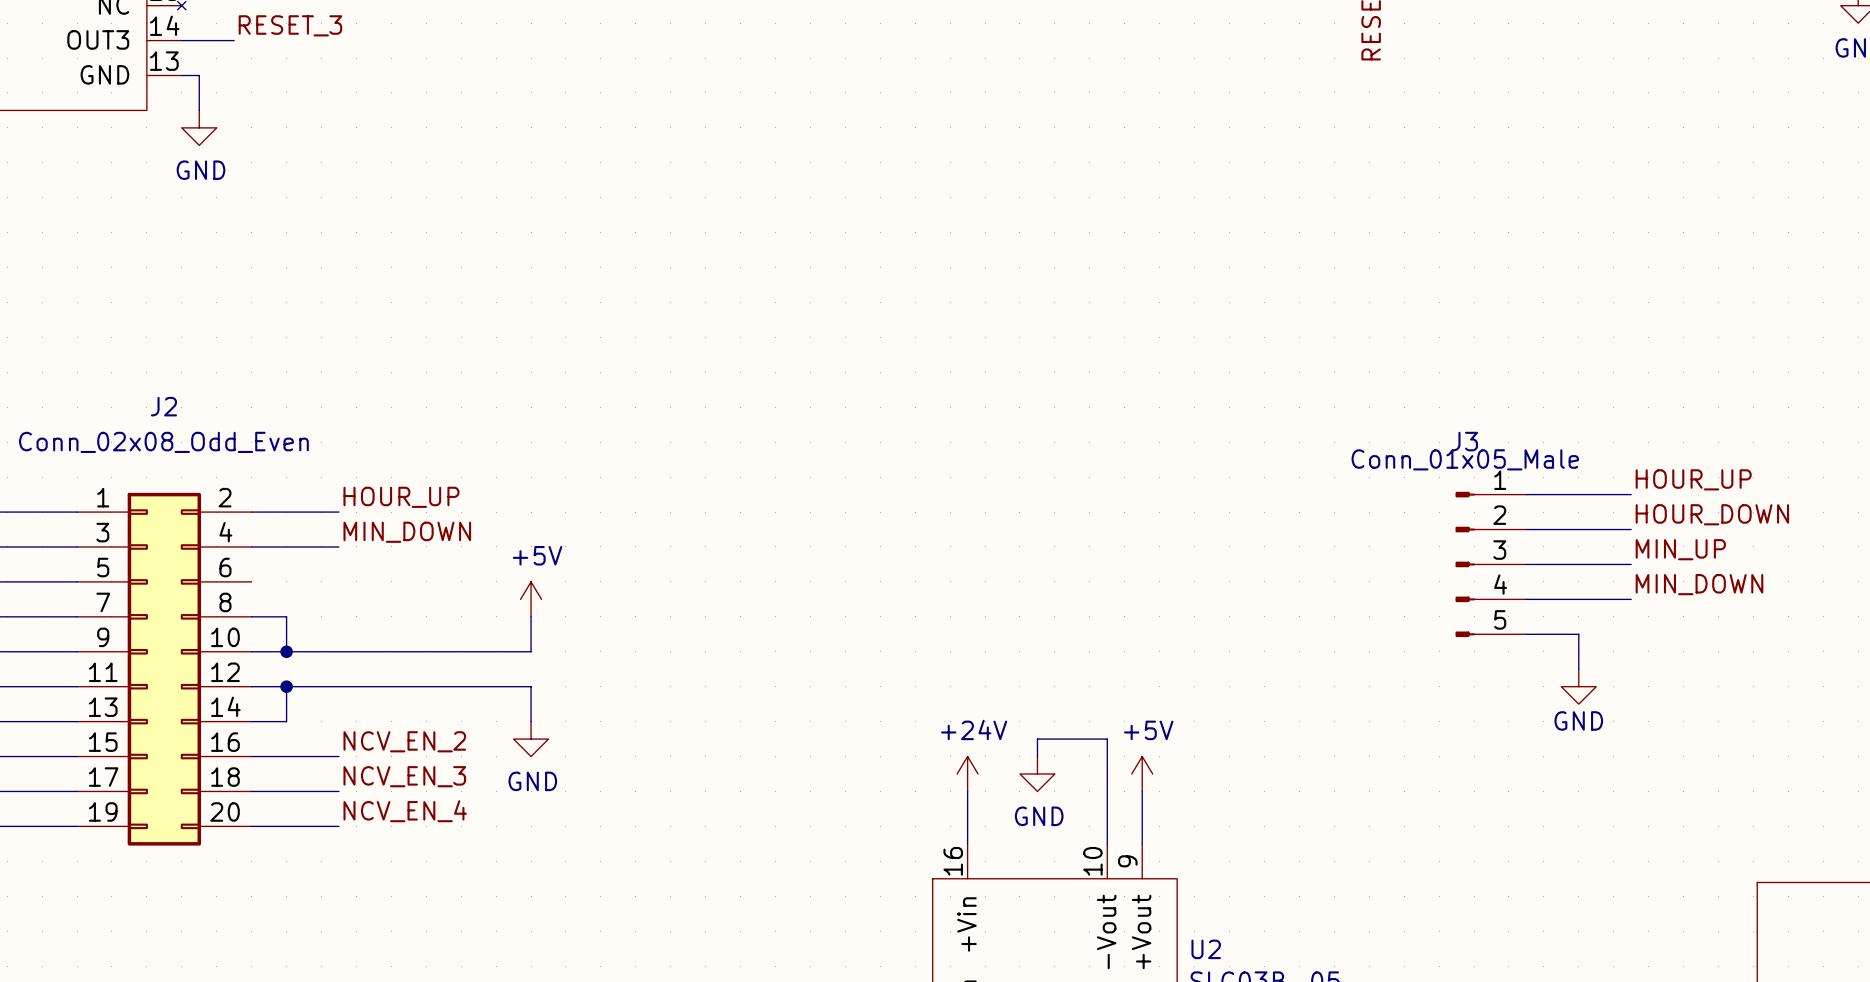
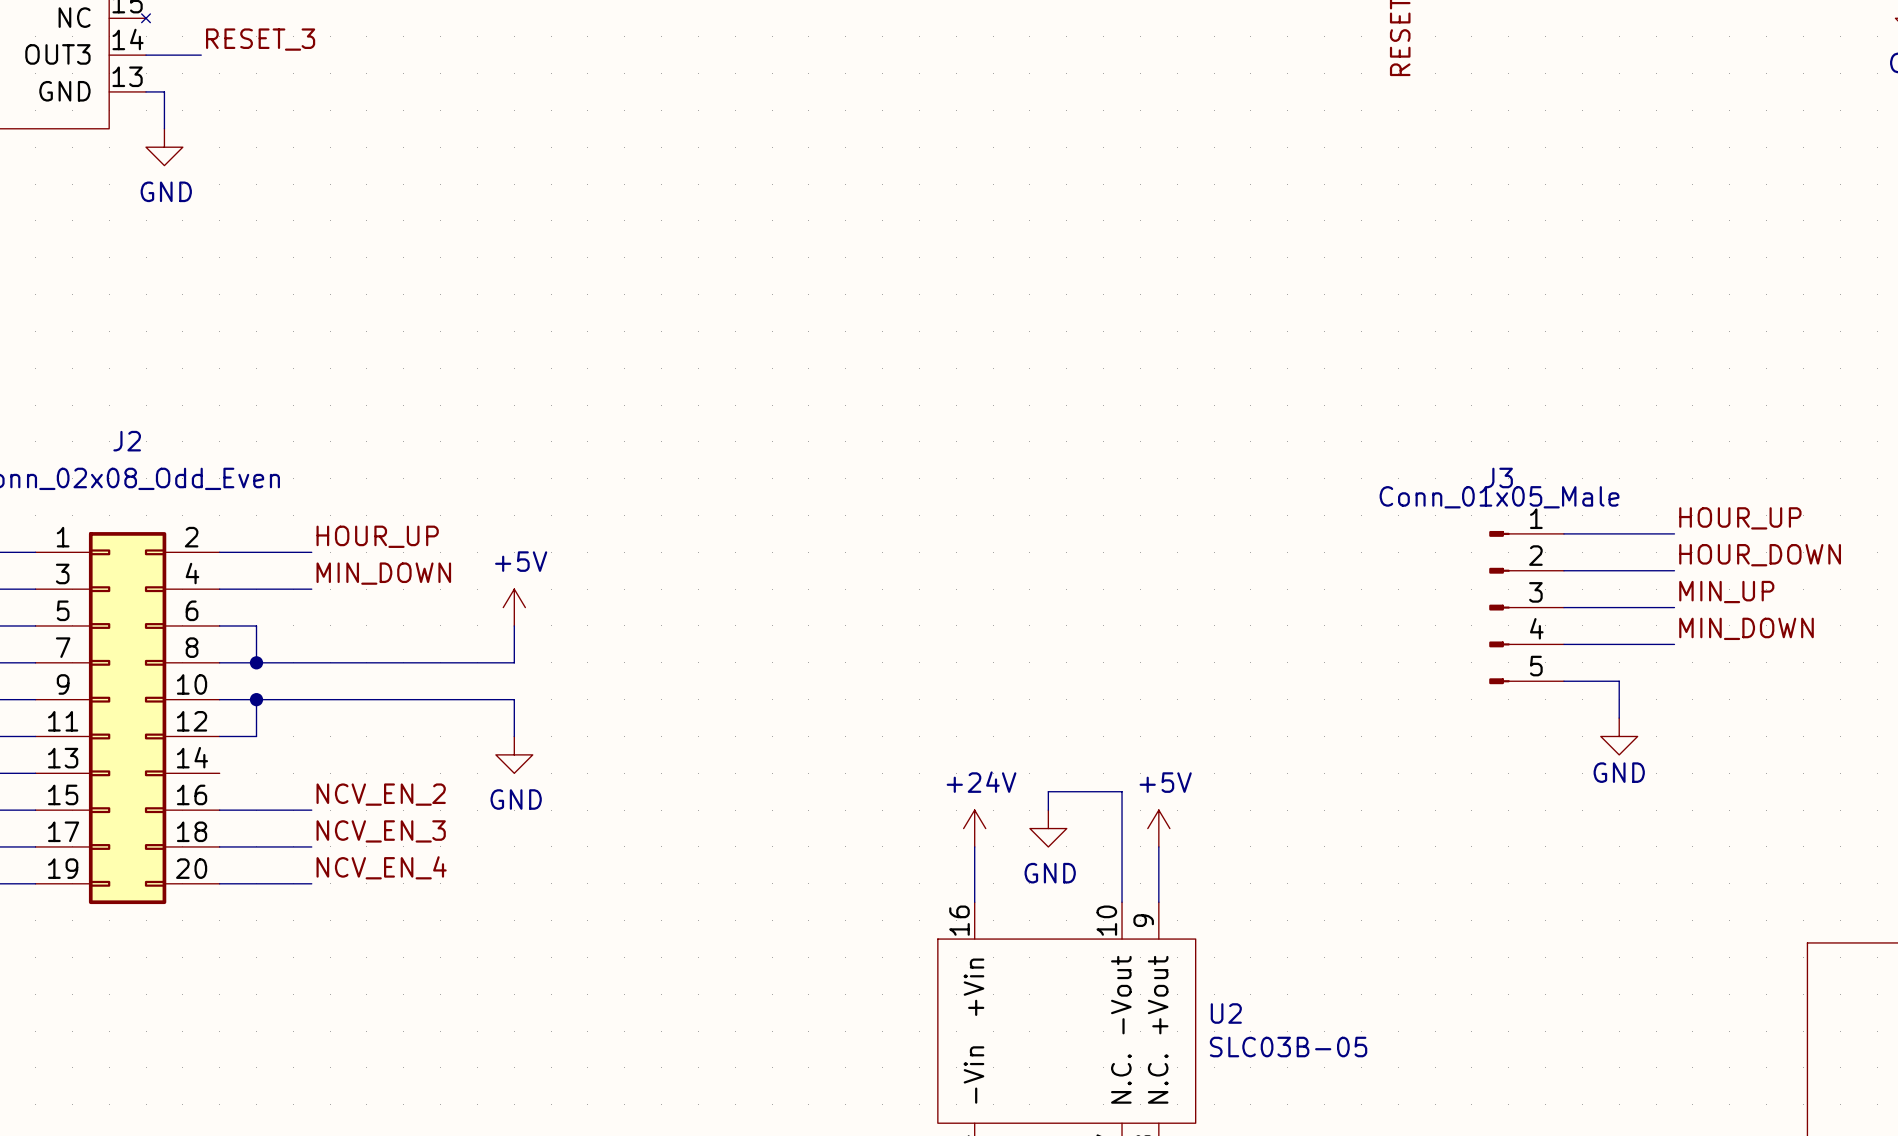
wire: none -> (219, 625) (256, 625) (256, 662) (514, 662) (514, 625)
power symbol position: +5V (531, 599) -> +5V (514, 607)
wire: (286, 616) (286, 651) -> (256, 736) (256, 699)
wire: (531, 616) (531, 651) -> (514, 736) (514, 699)
junction position: (286, 686) -> (256, 662)
wire: (251, 721) (286, 721) (286, 686) (531, 686) (531, 721) -> none
power symbol position: GND (531, 739) -> GND (514, 754)

